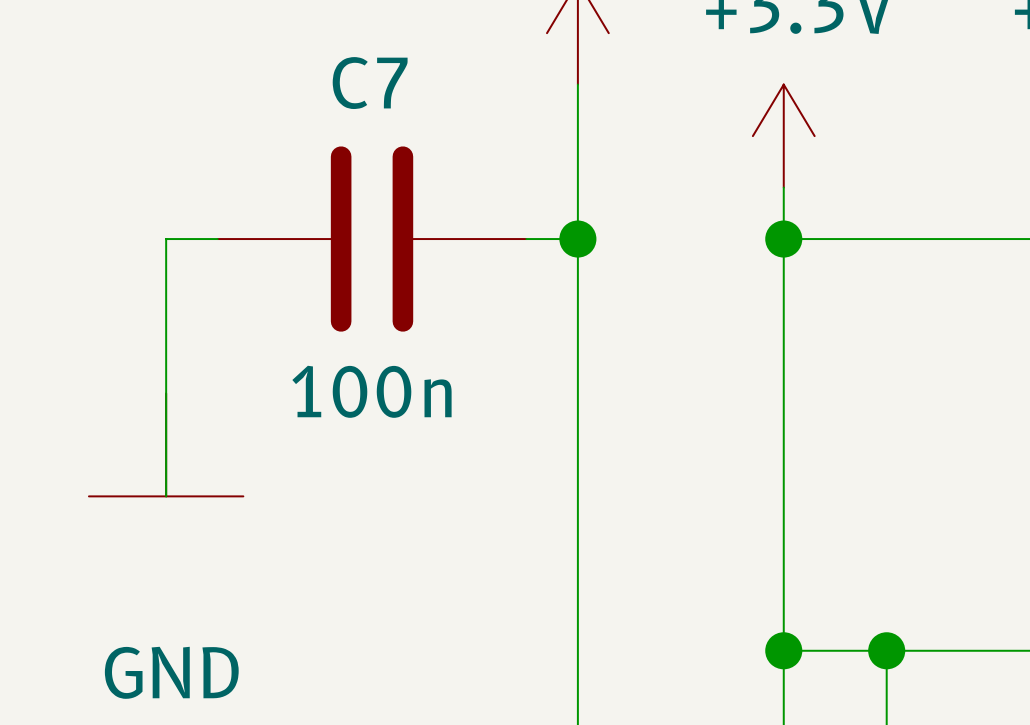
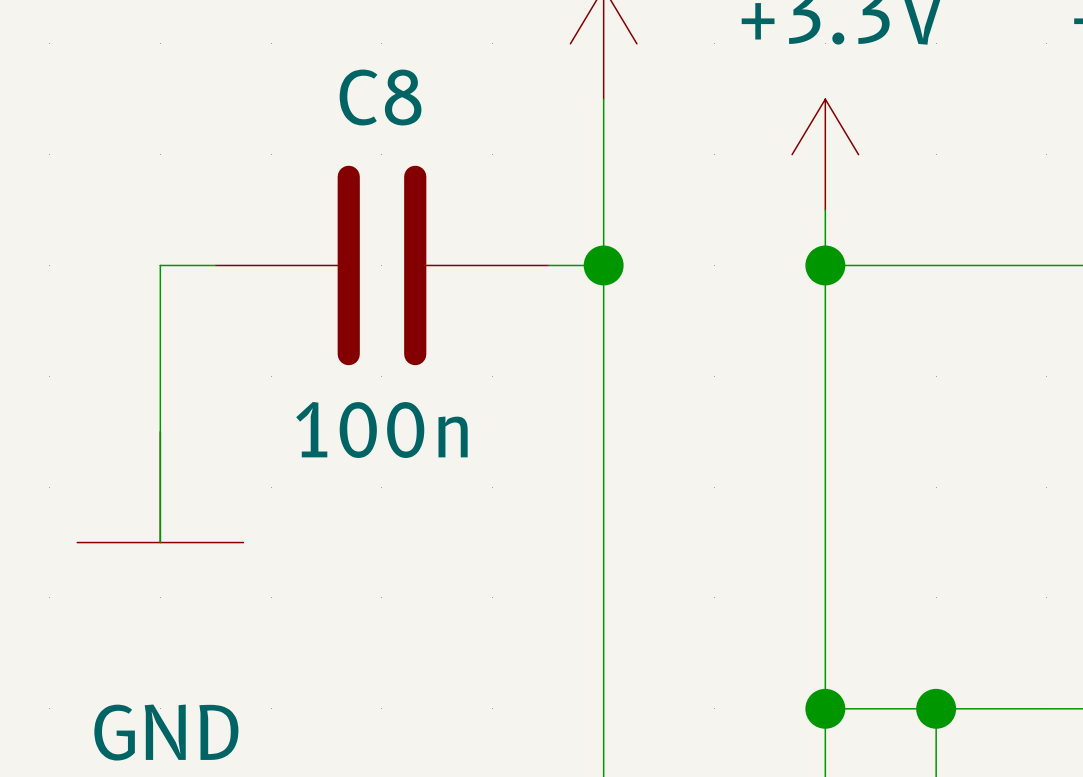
C7 name: C7 (370, 83) -> C8 (380, 97)

